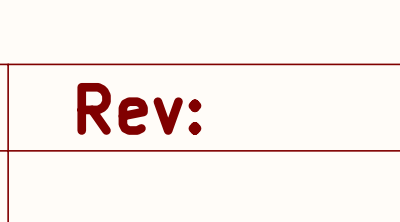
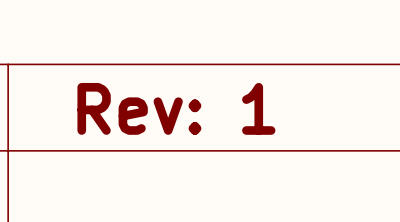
title block: Rev: (139, 108) -> Rev: 1 (176, 108)

